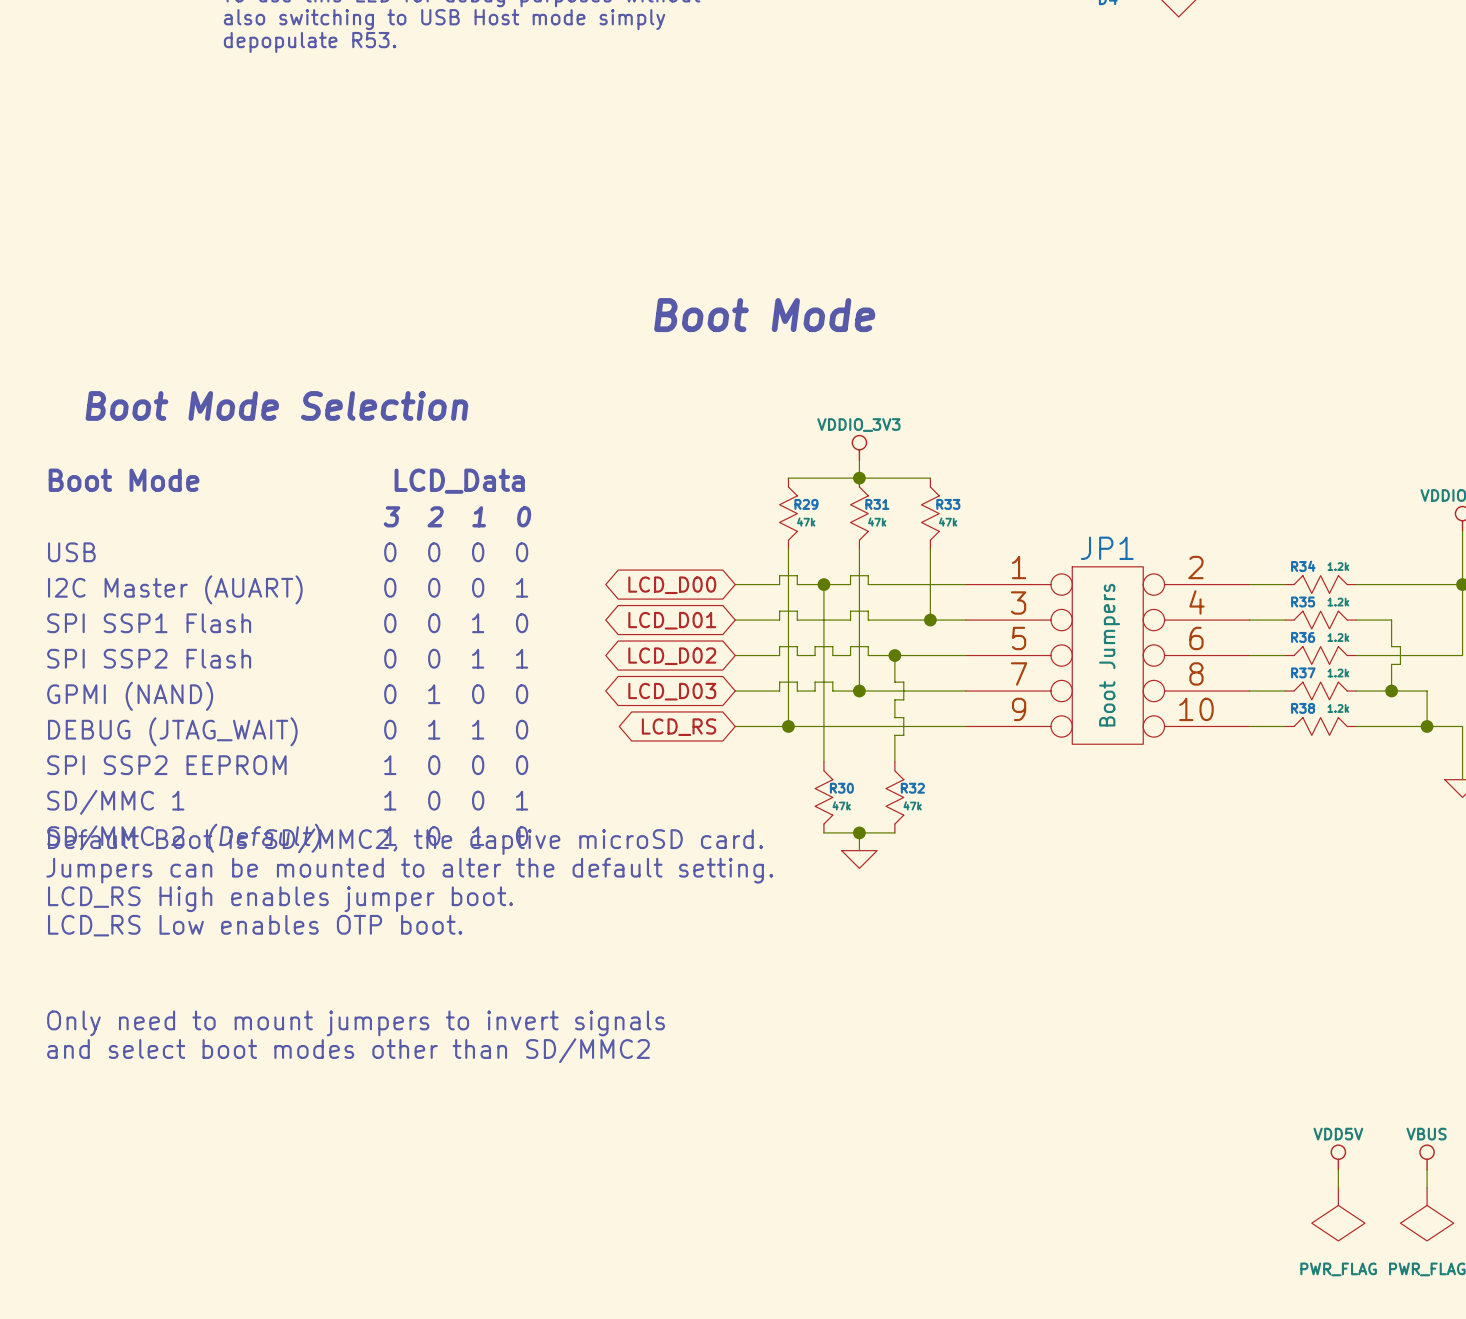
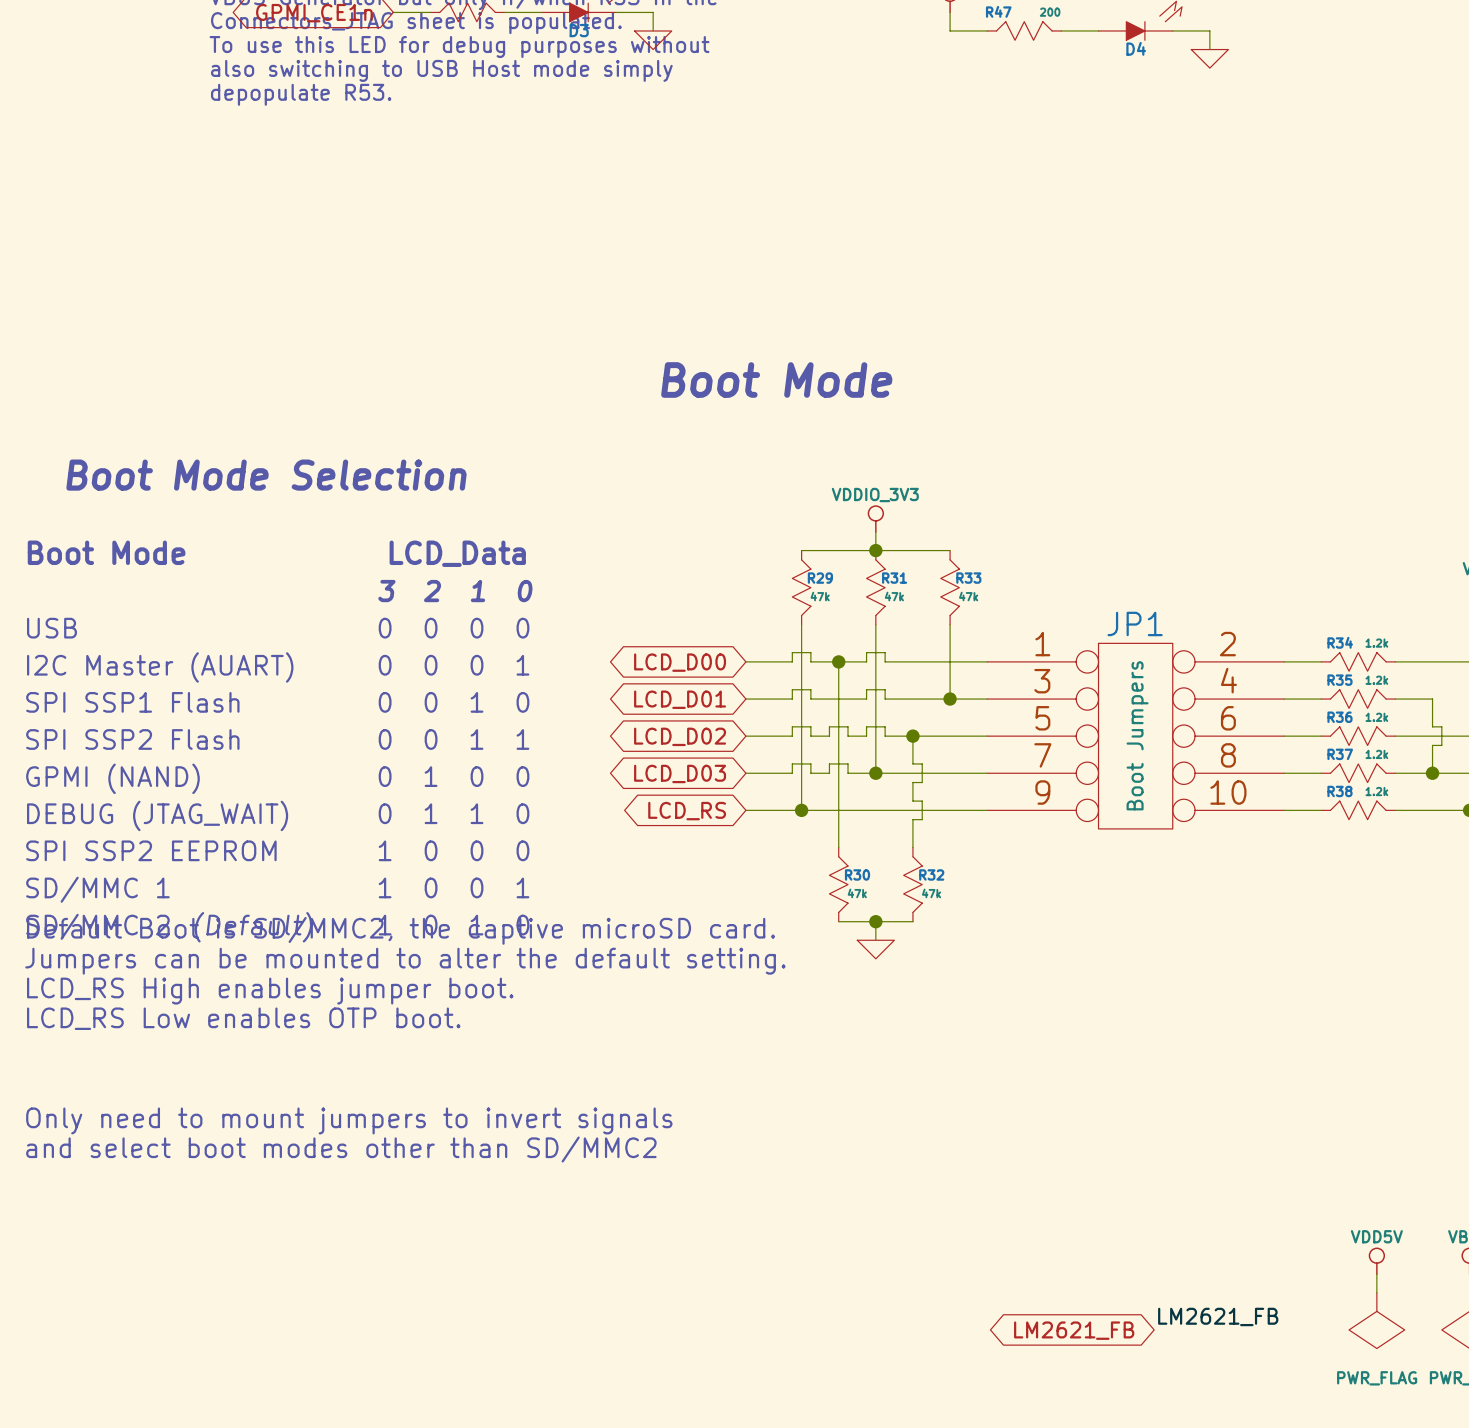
label: none -> LM2621_FB (1218, 1316)
global label: none -> LM2621_FB (1074, 1330)

